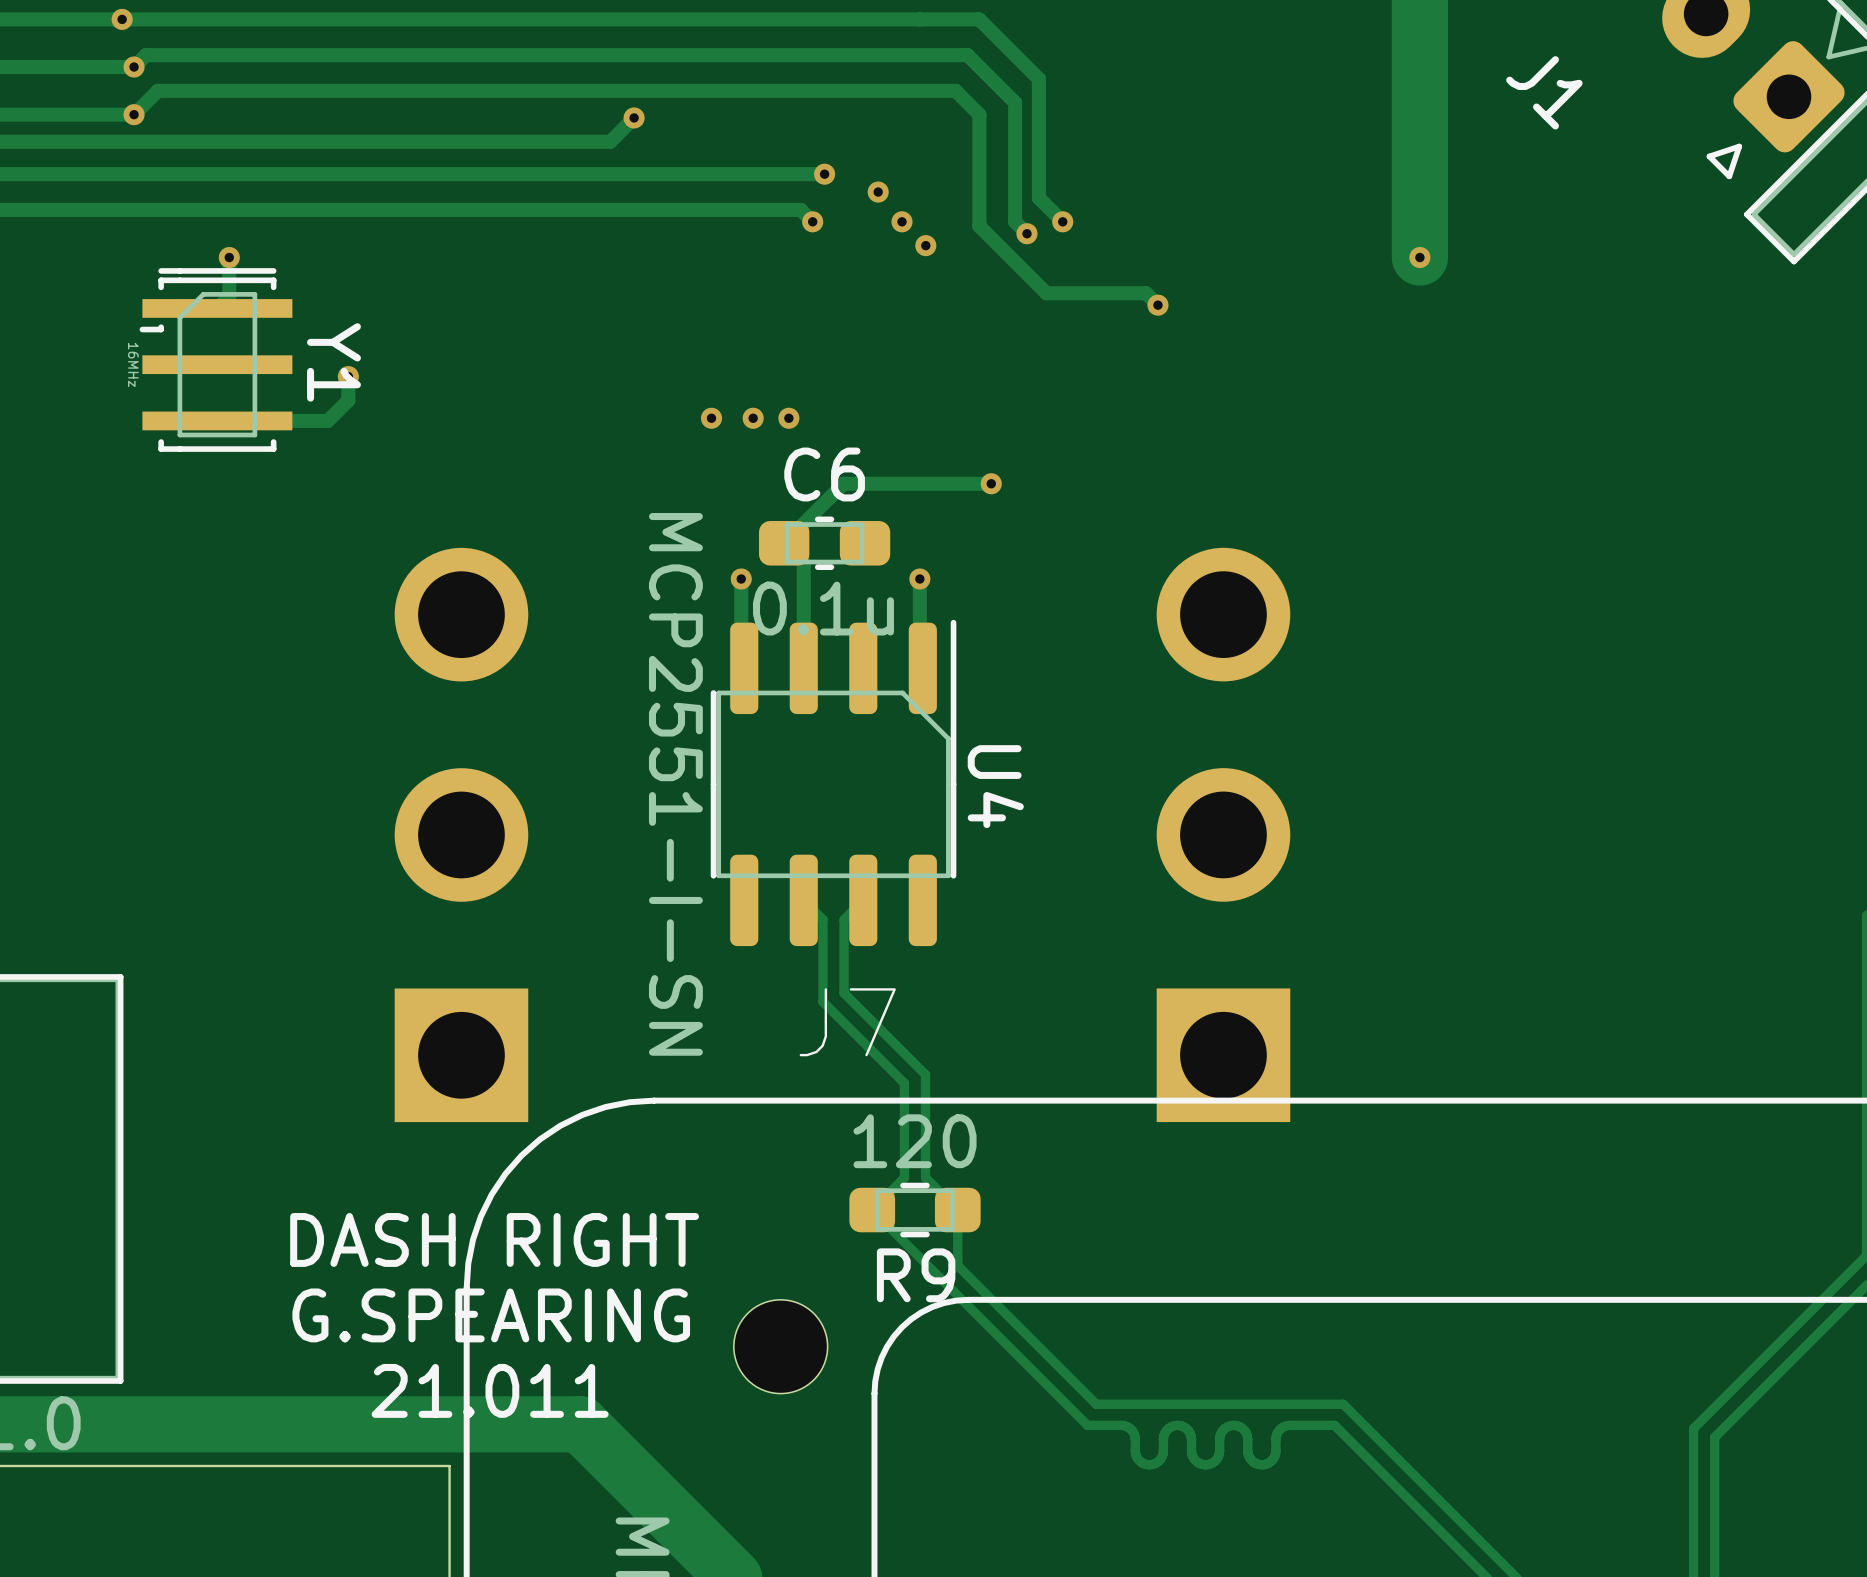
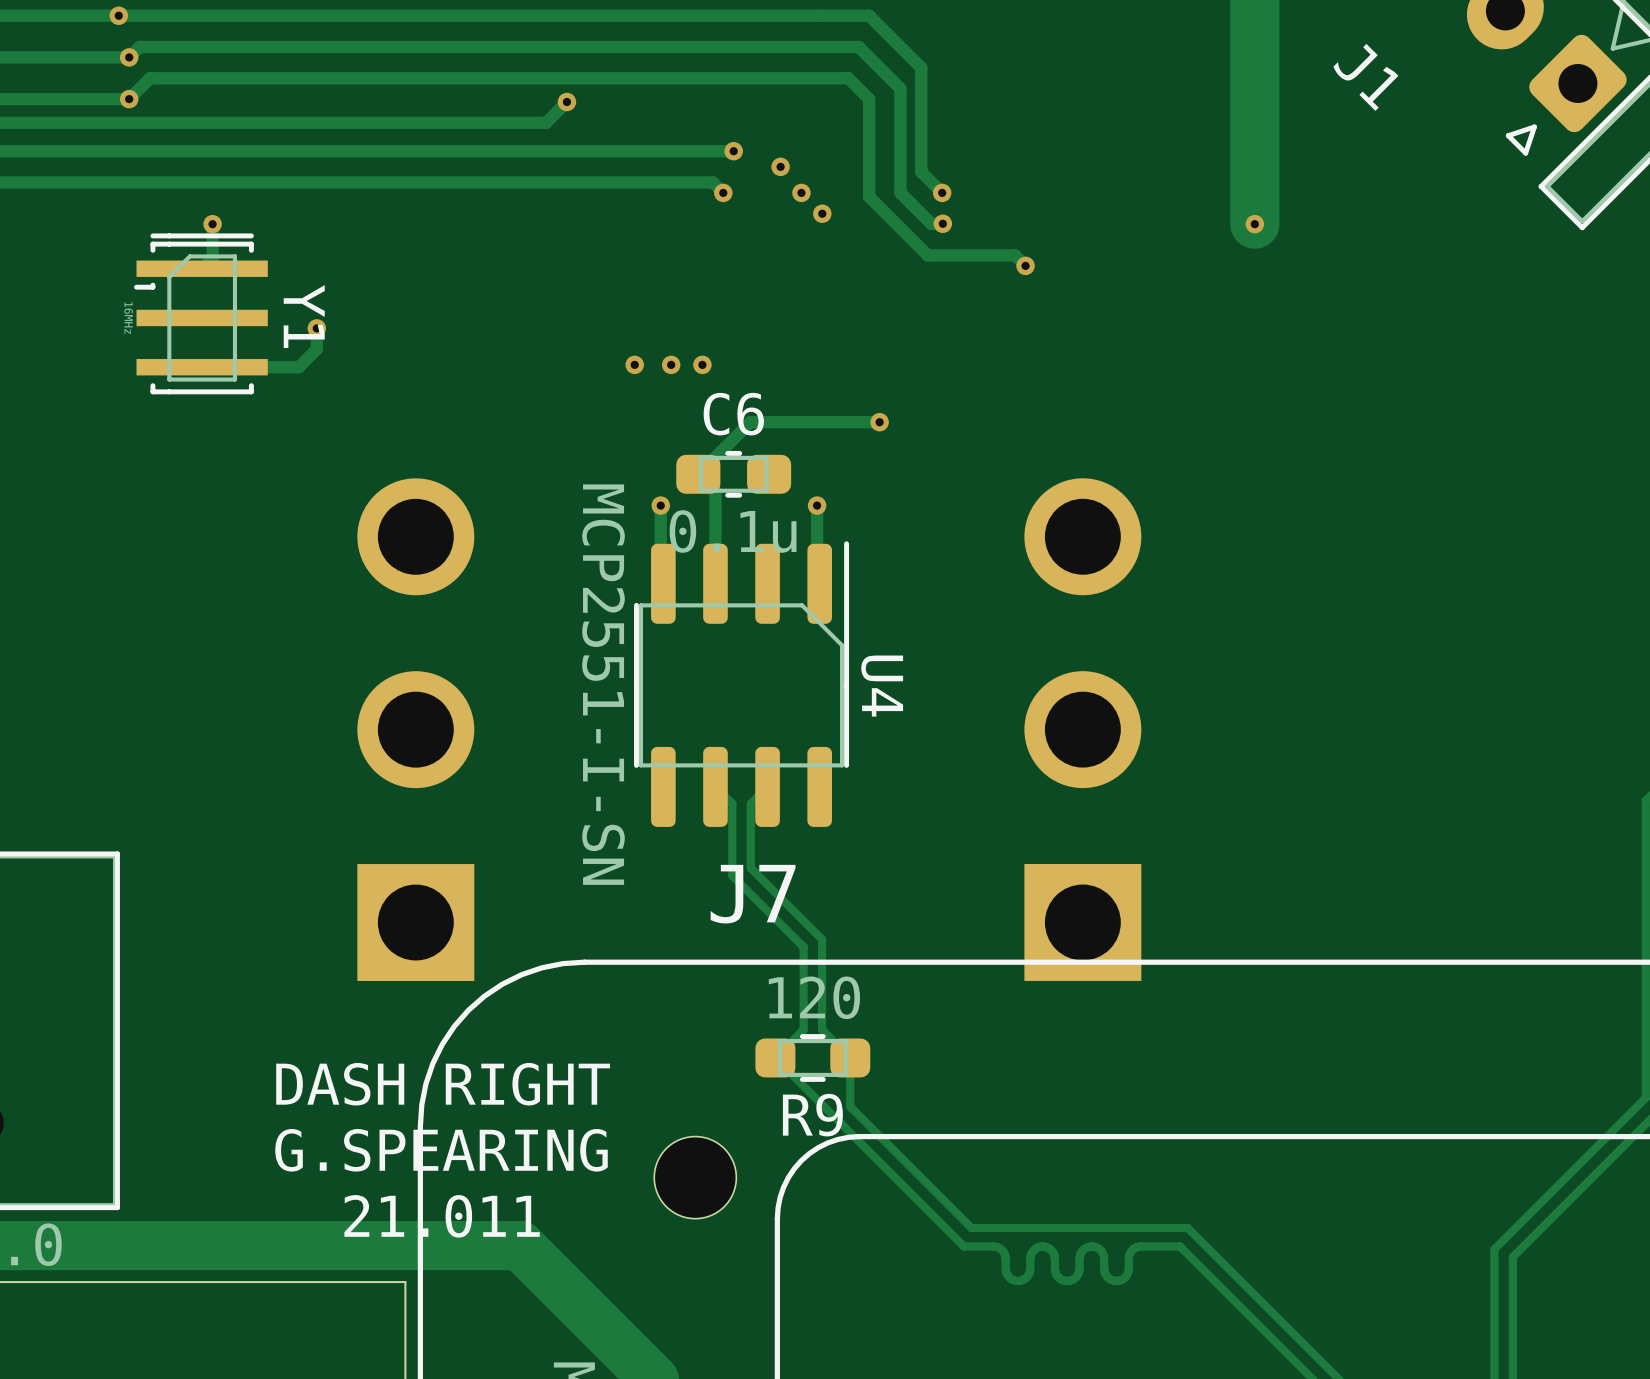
track: none -> (910, 203) (931, 223) (942, 223)
via position: (1027, 233) -> (942, 223)

